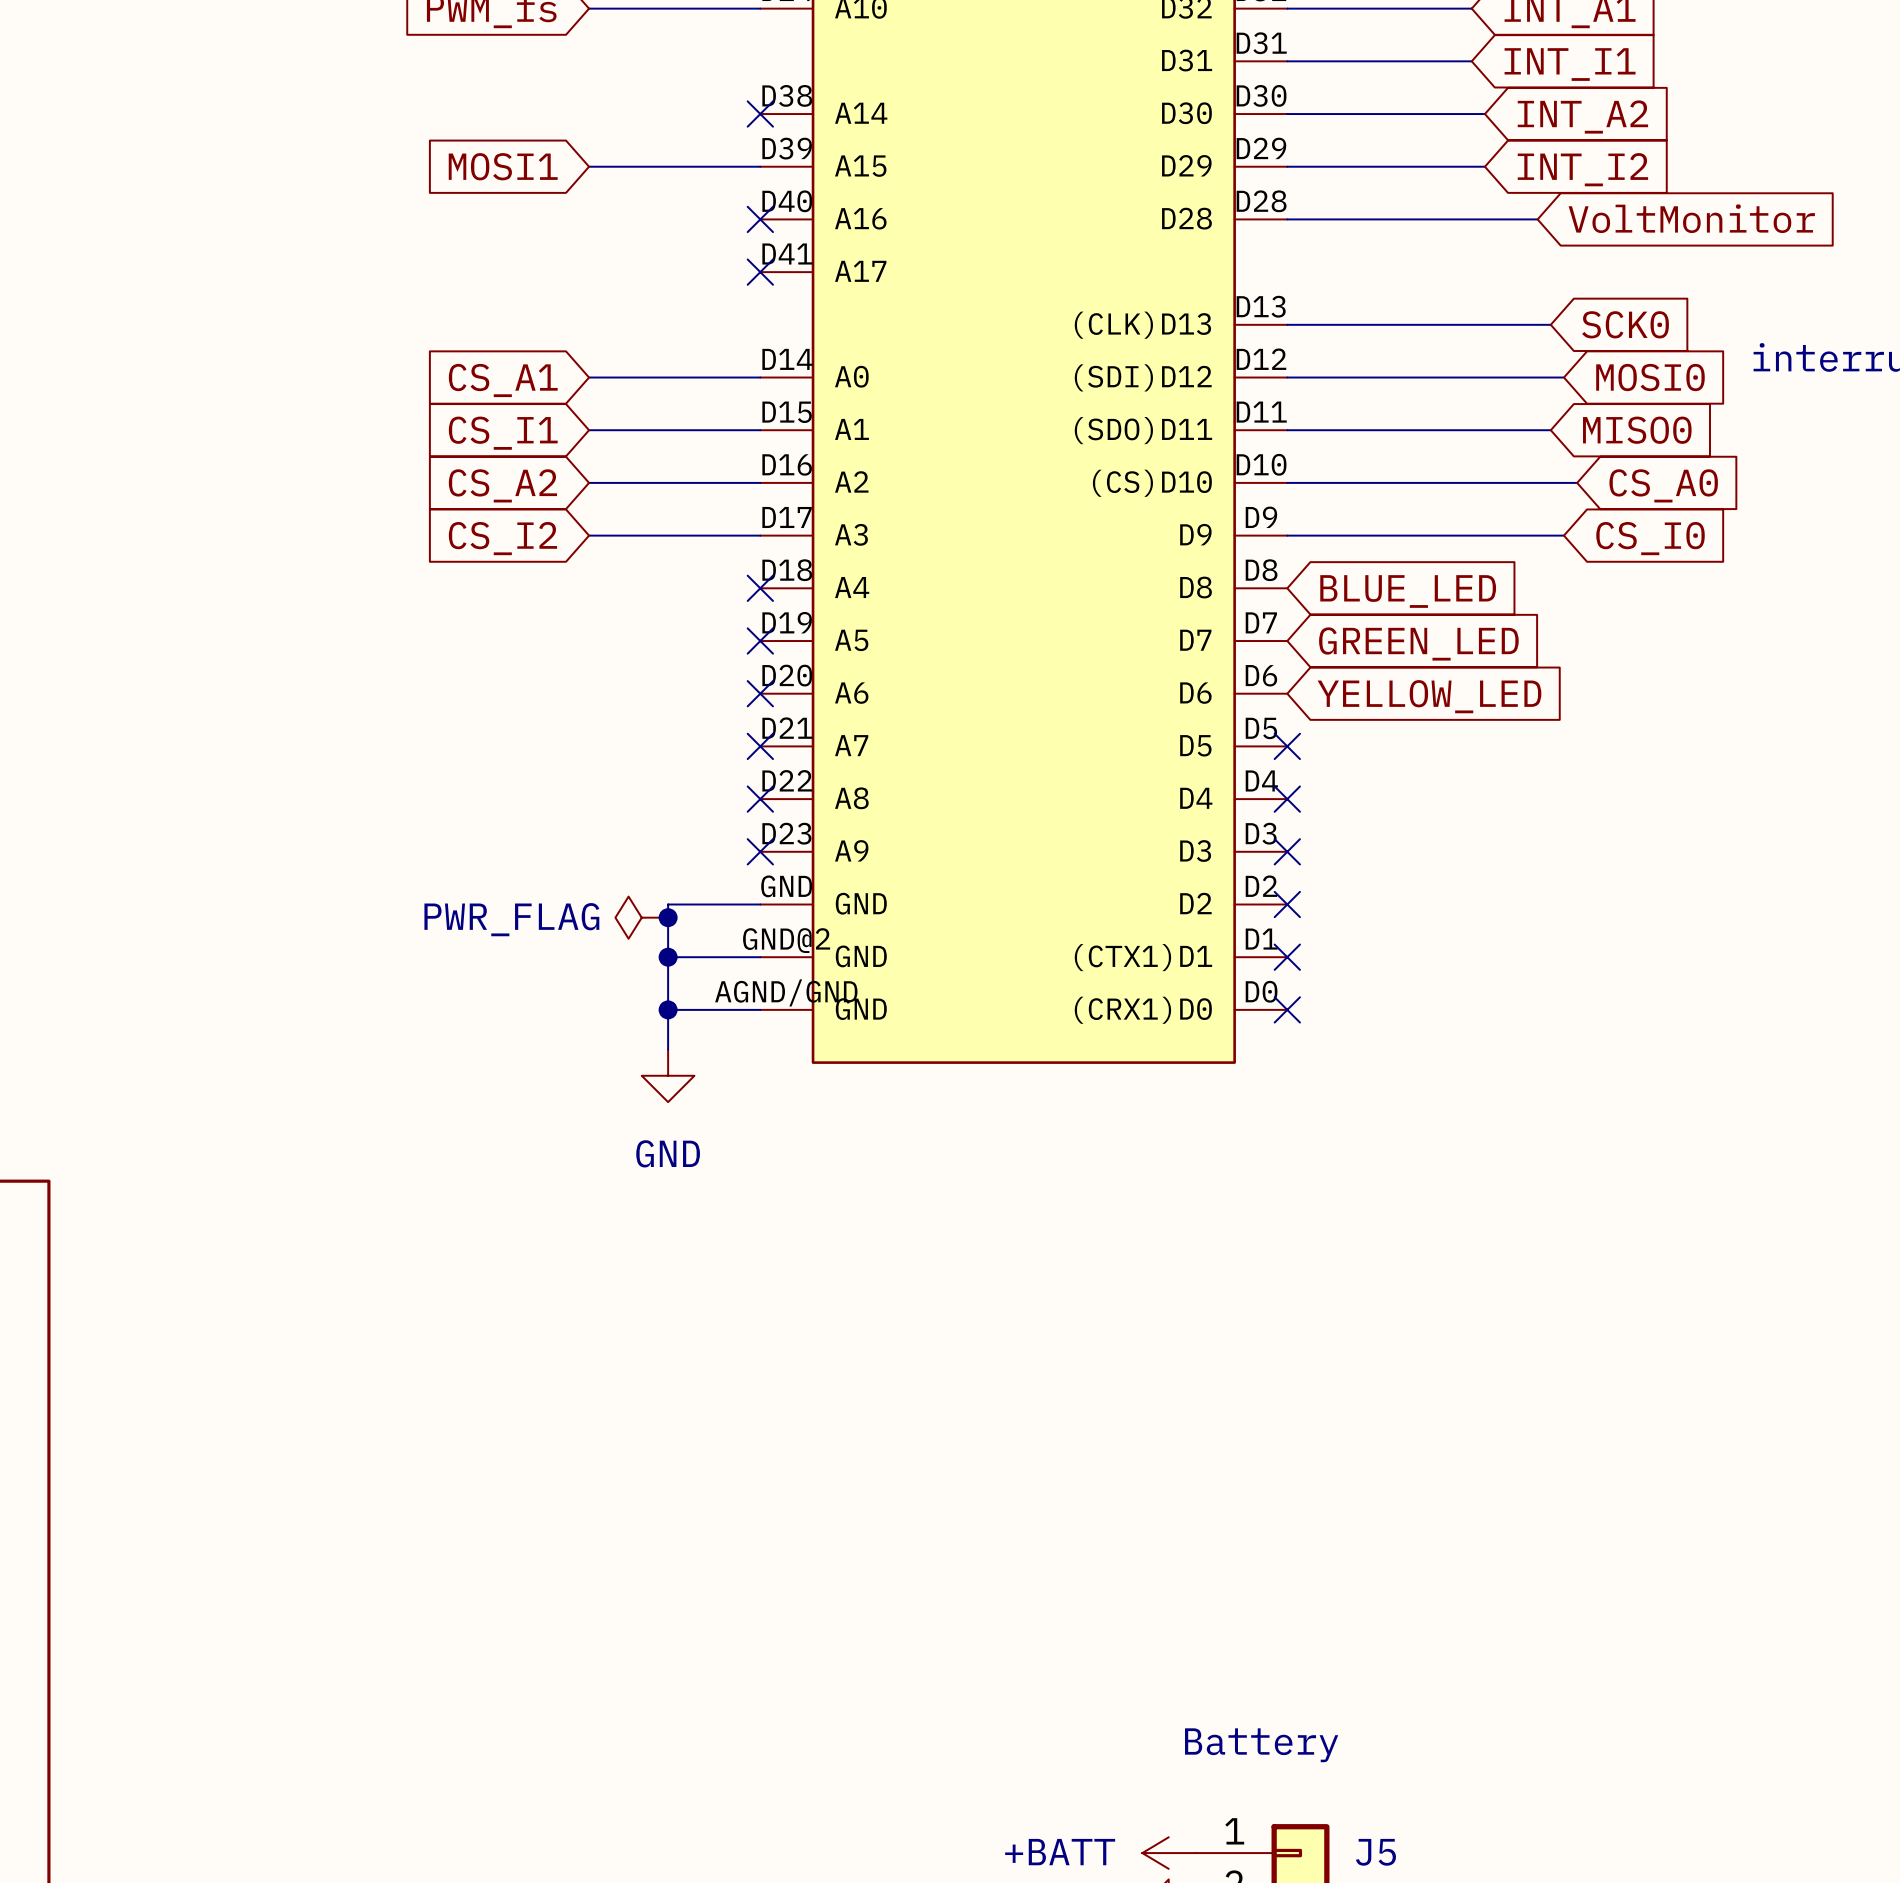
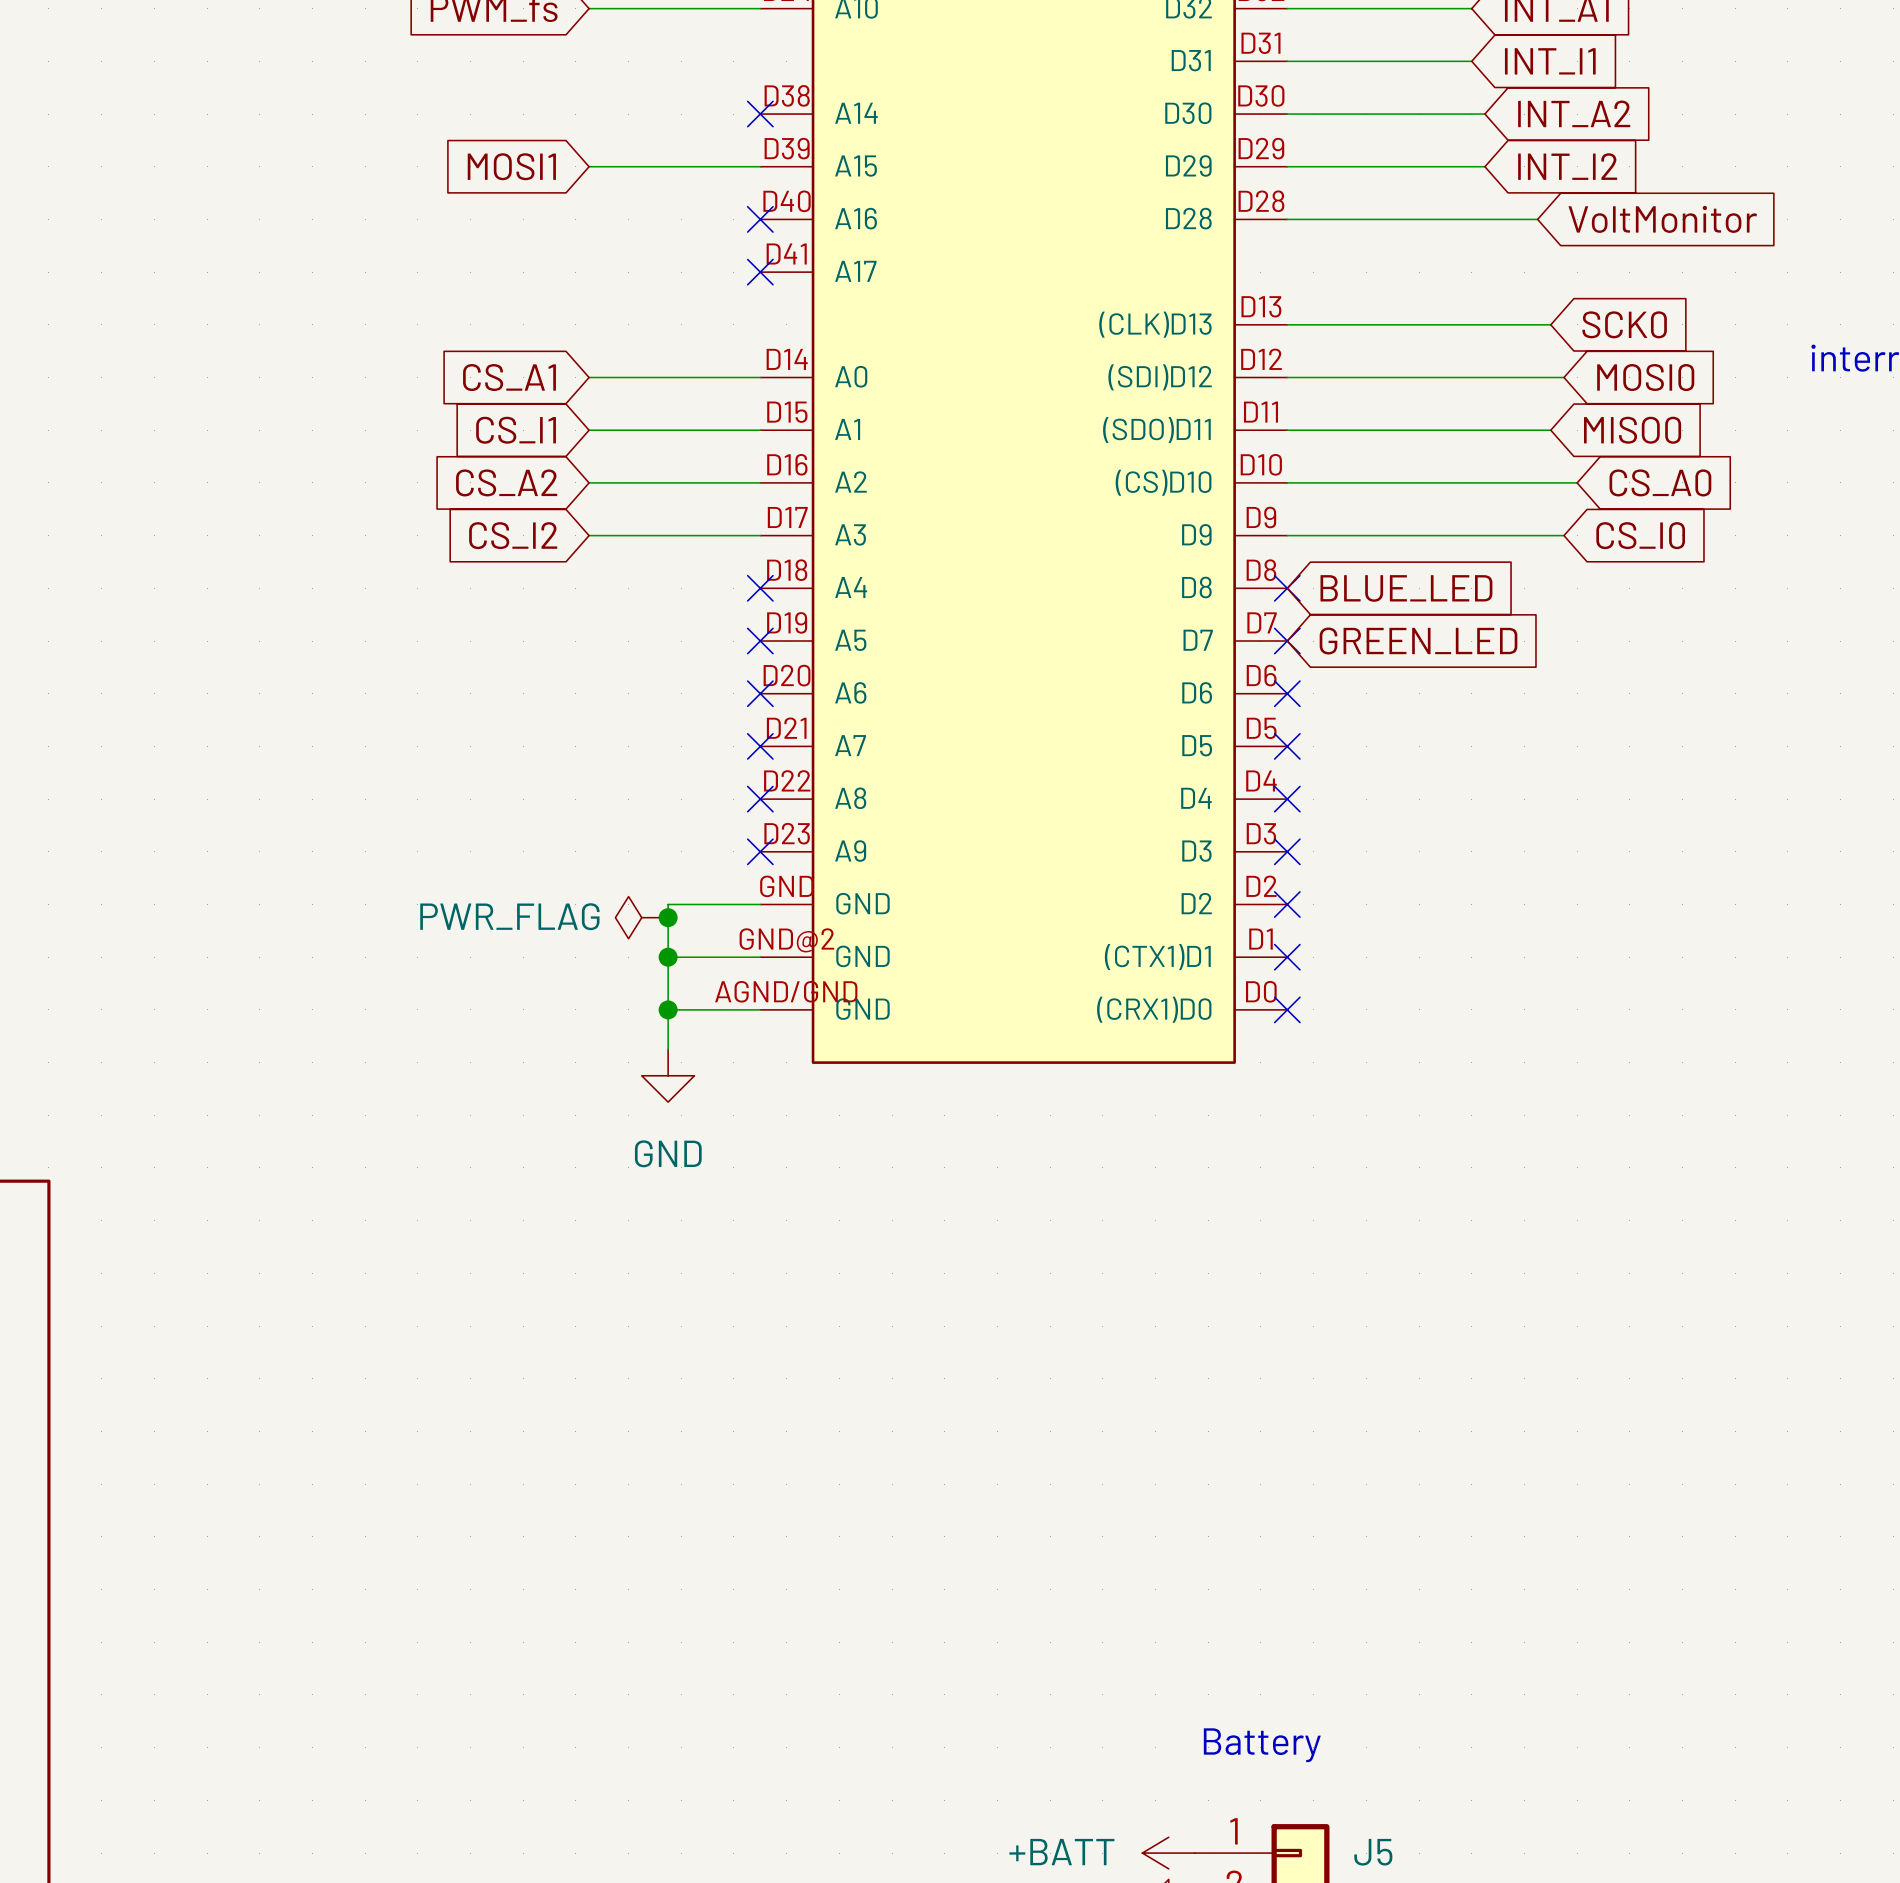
no-connect mark: none -> (1287, 588)
no-connect mark: none -> (1287, 641)
no-connect mark: none -> (1287, 693)
global label: YELLOW_LED (1429, 696) -> none

